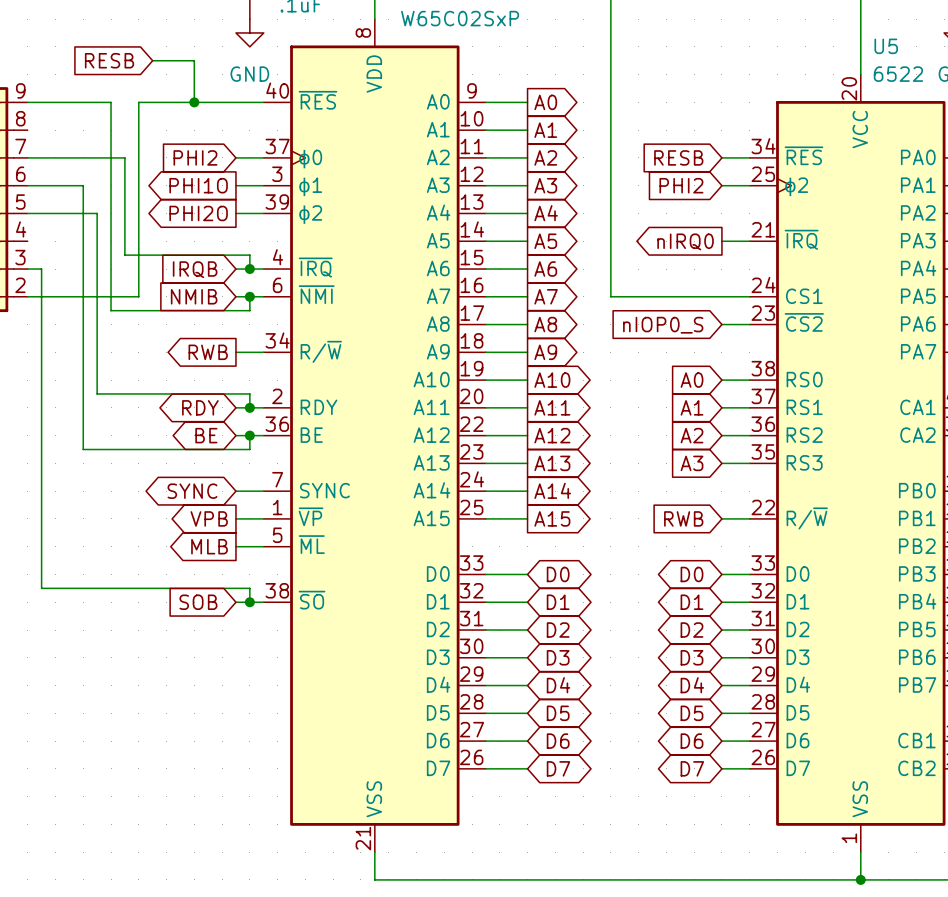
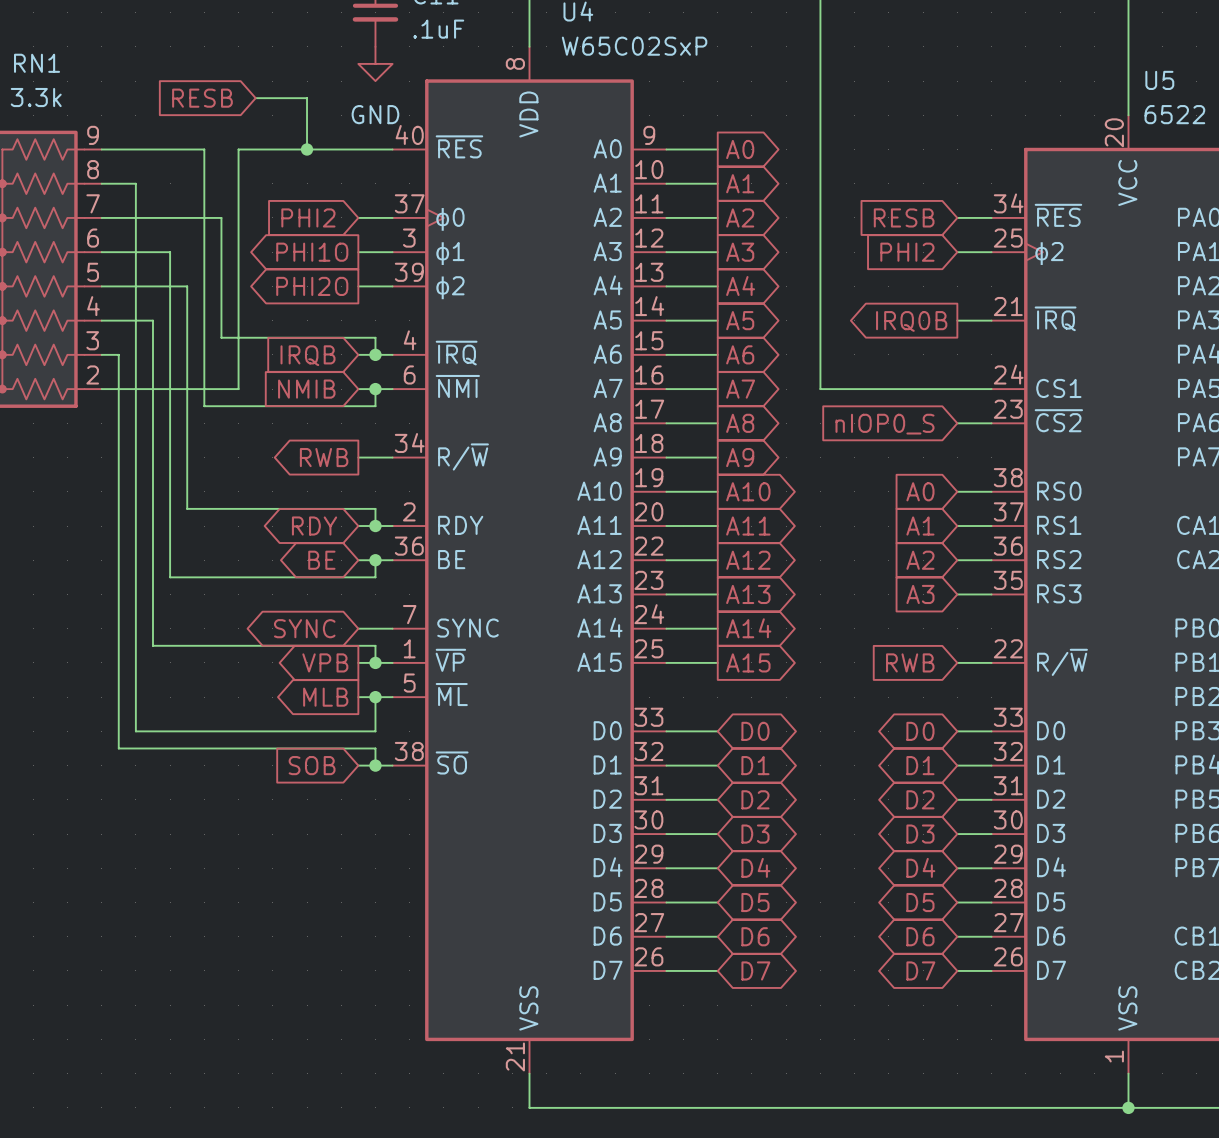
wire: none -> (101, 183) (135, 183) (135, 731) (375, 731) (375, 697)
wire: none -> (101, 320) (152, 320) (152, 645) (375, 645) (375, 662)
global label: nIRQ0 (685, 241) -> IRQ0B (911, 321)
junction: none -> (375, 662)
junction: none -> (375, 697)

